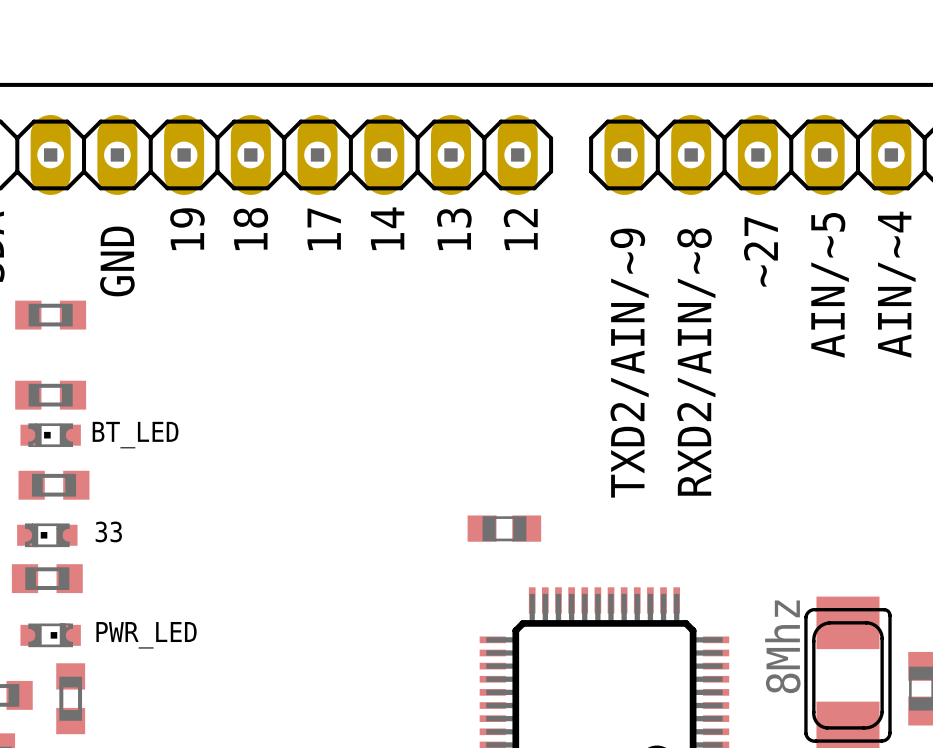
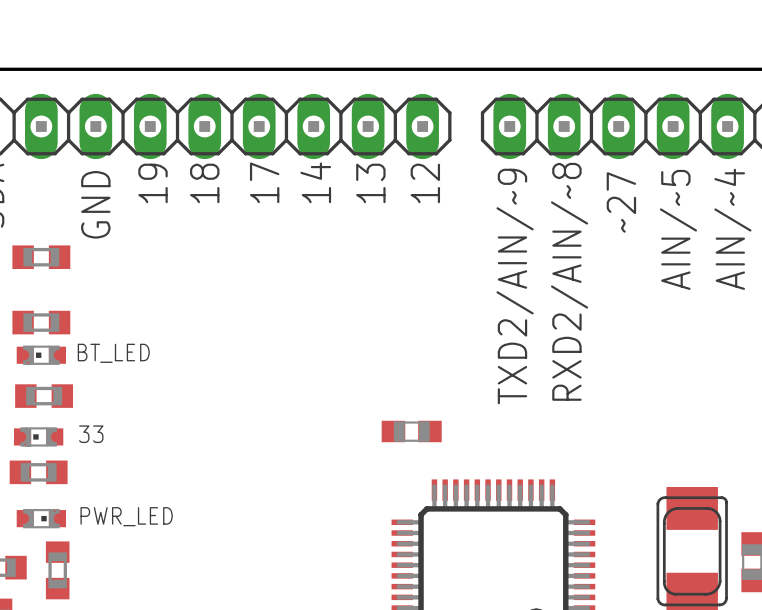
part value: 8Mhz (782, 646) -> none

